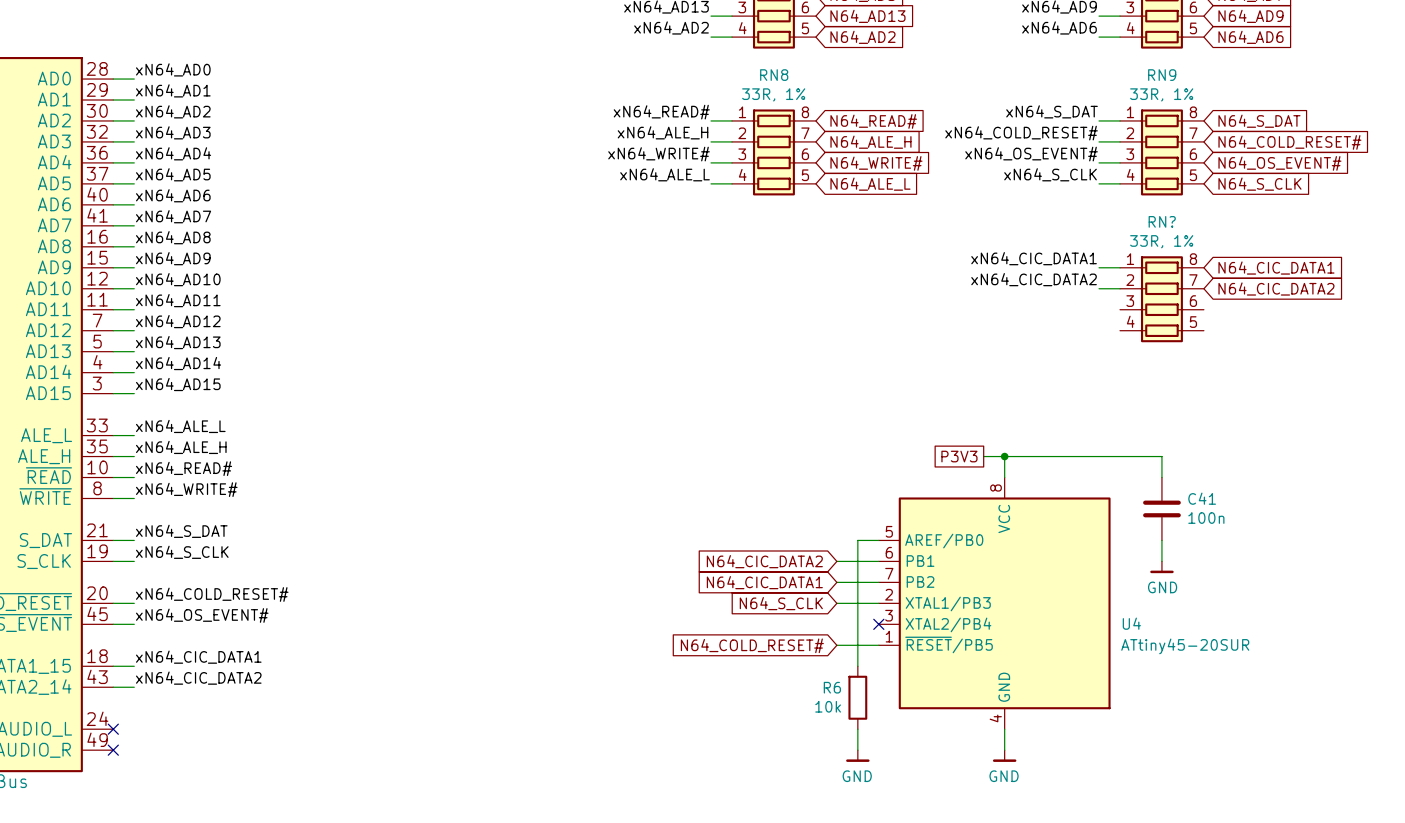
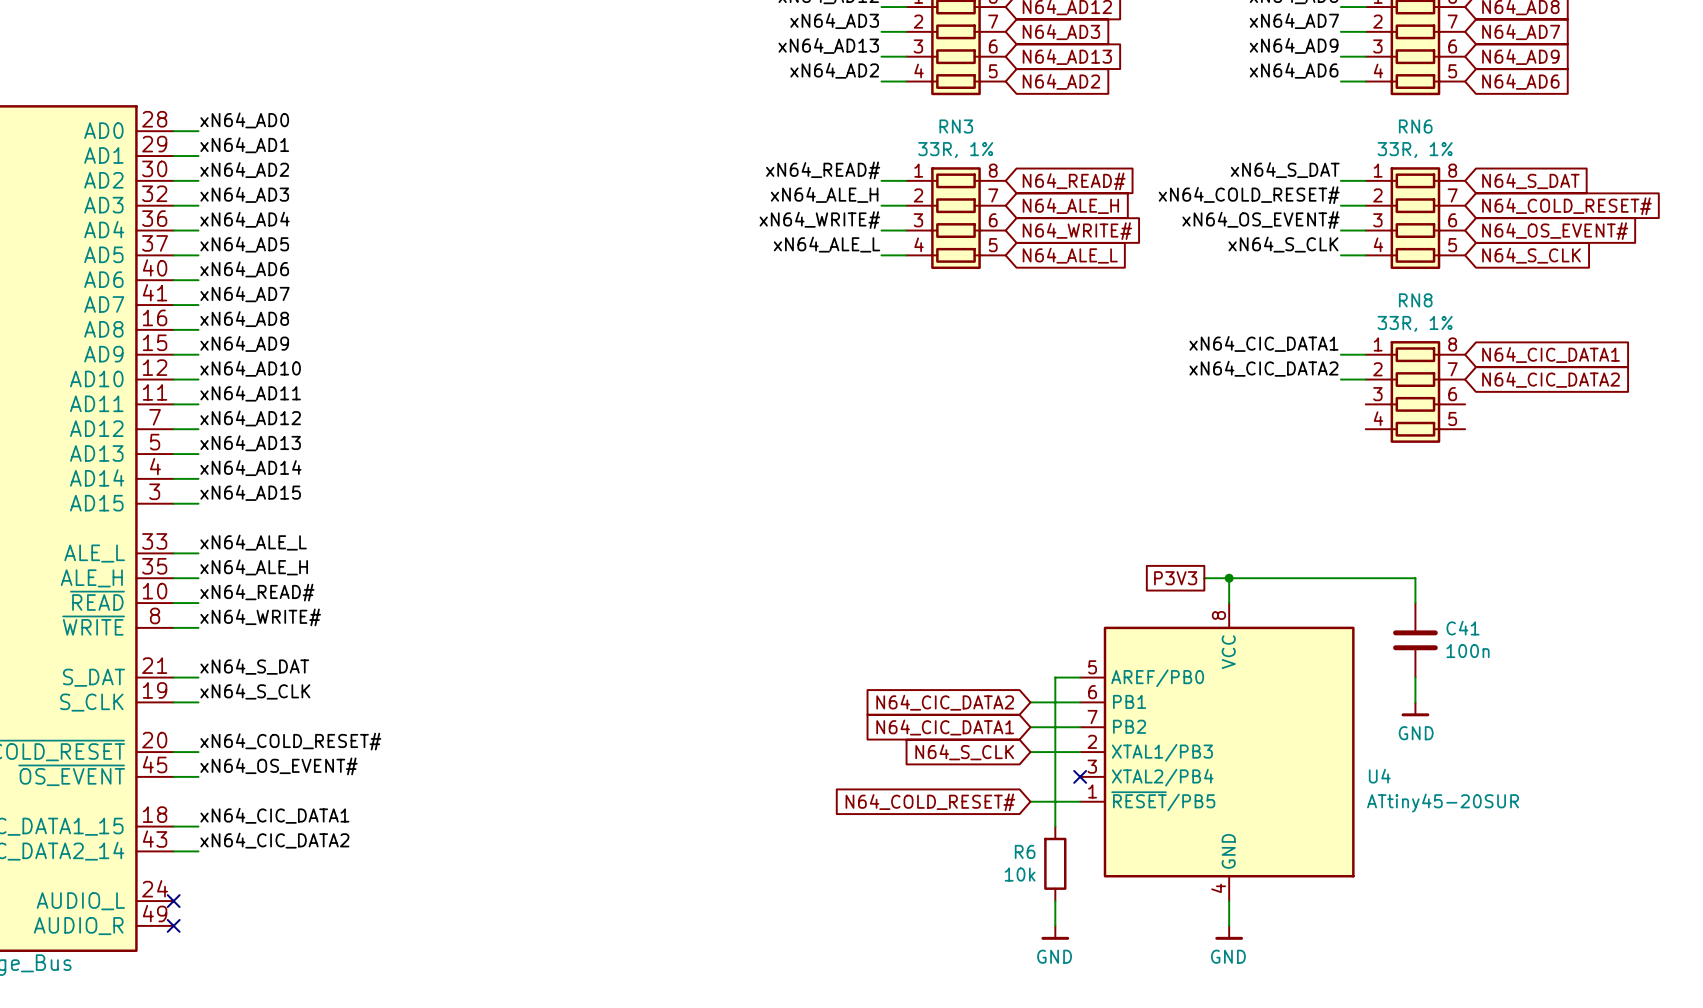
RN8 name: RN8 (774, 75) -> RN3 (956, 126)
RN9 name: RN9 (1162, 75) -> RN6 (1415, 126)
RN? name: RN? (1162, 221) -> RN8 (1415, 300)

